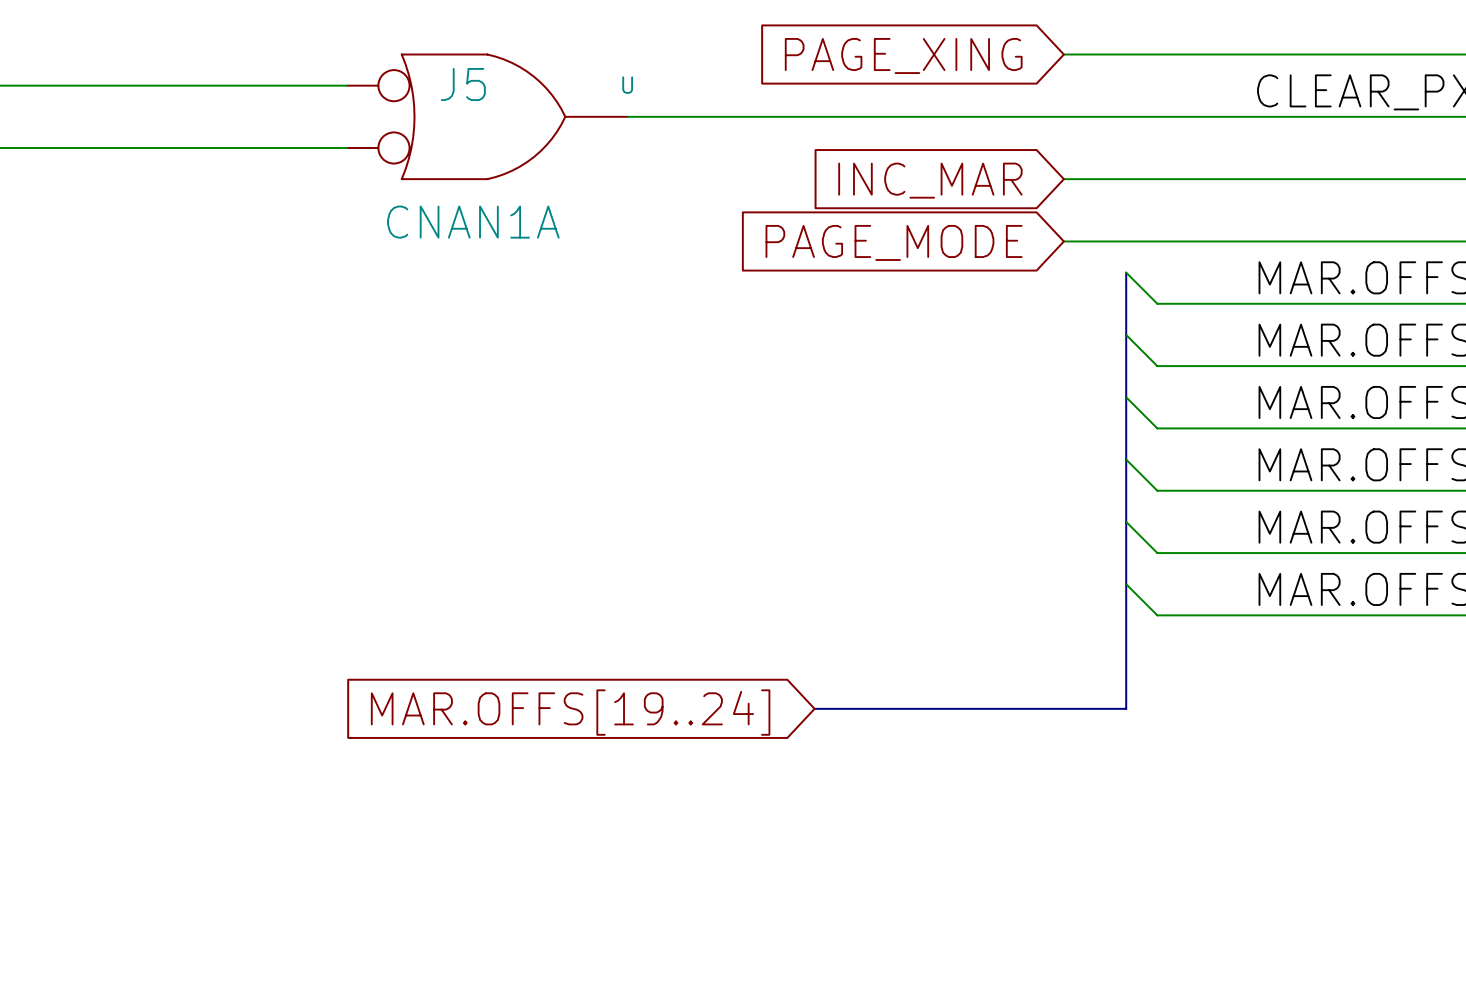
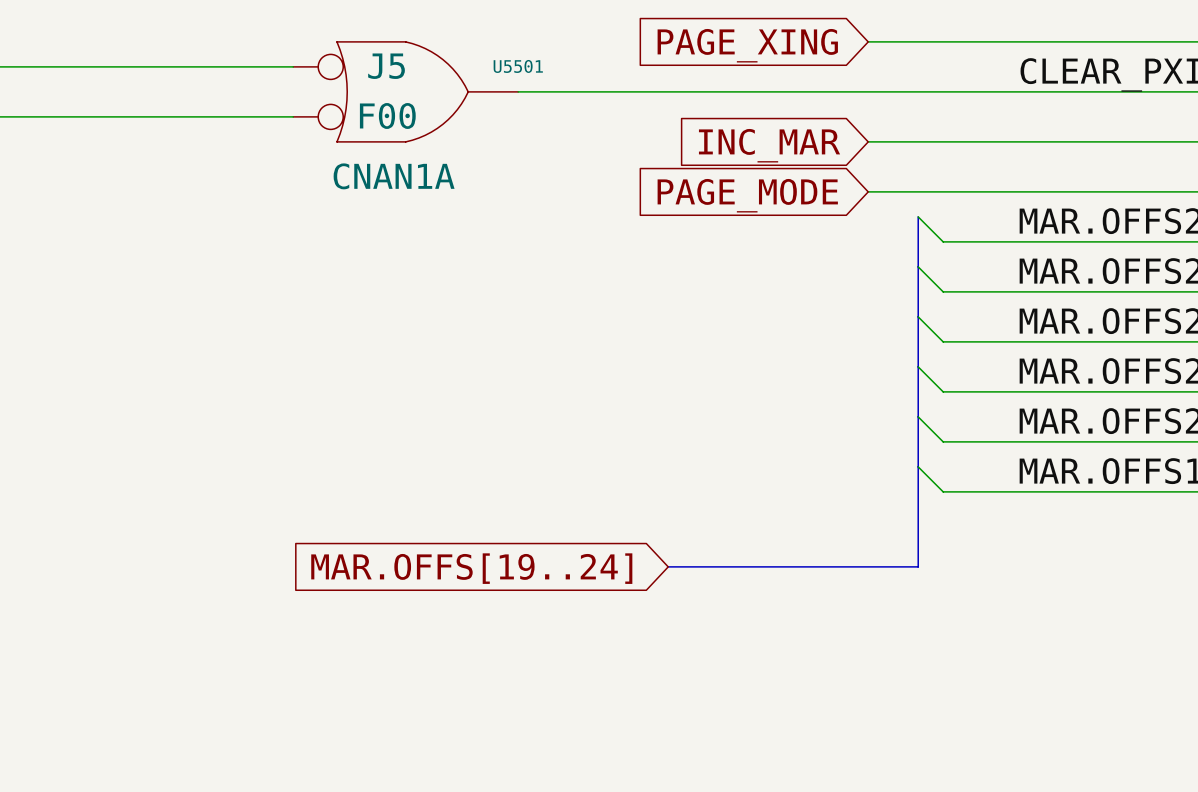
U name: U (627, 85) -> U5501 (518, 66)
U value: none -> F00 (387, 115)

